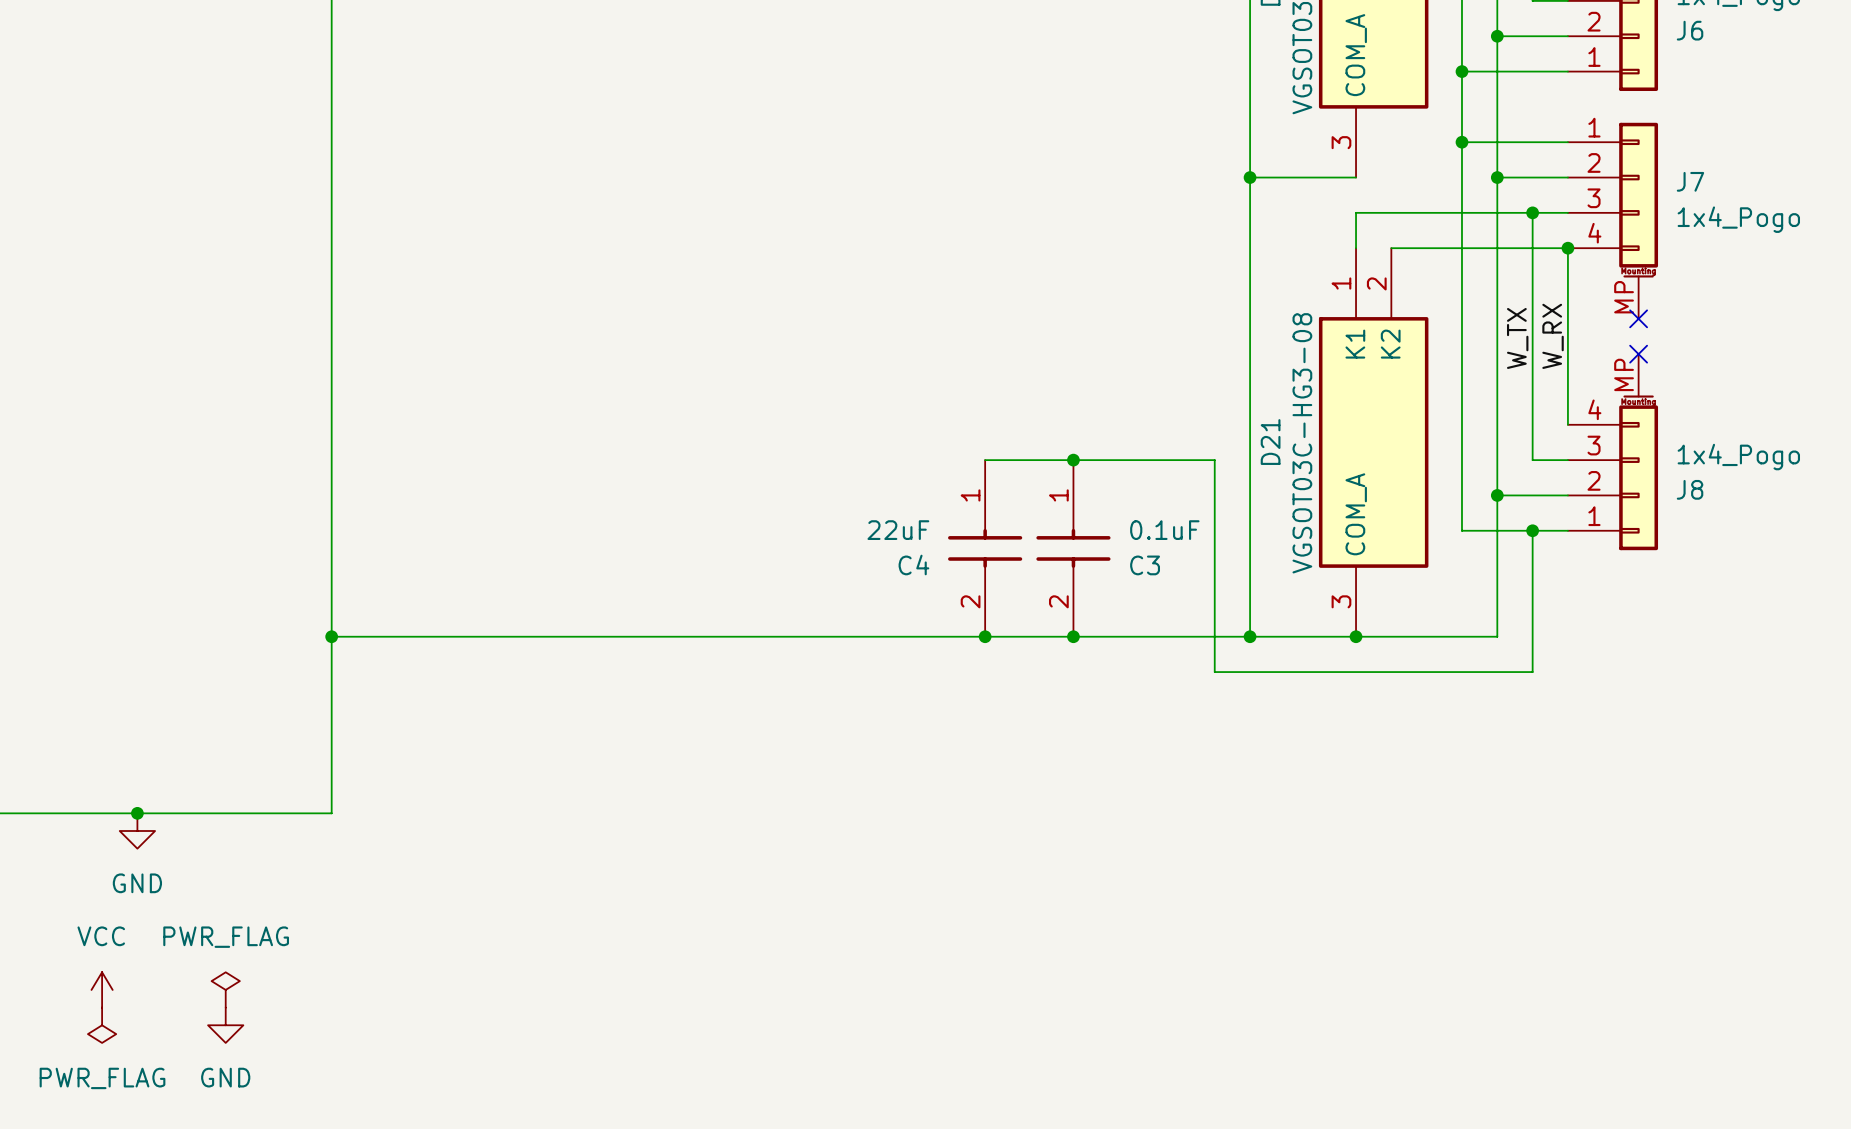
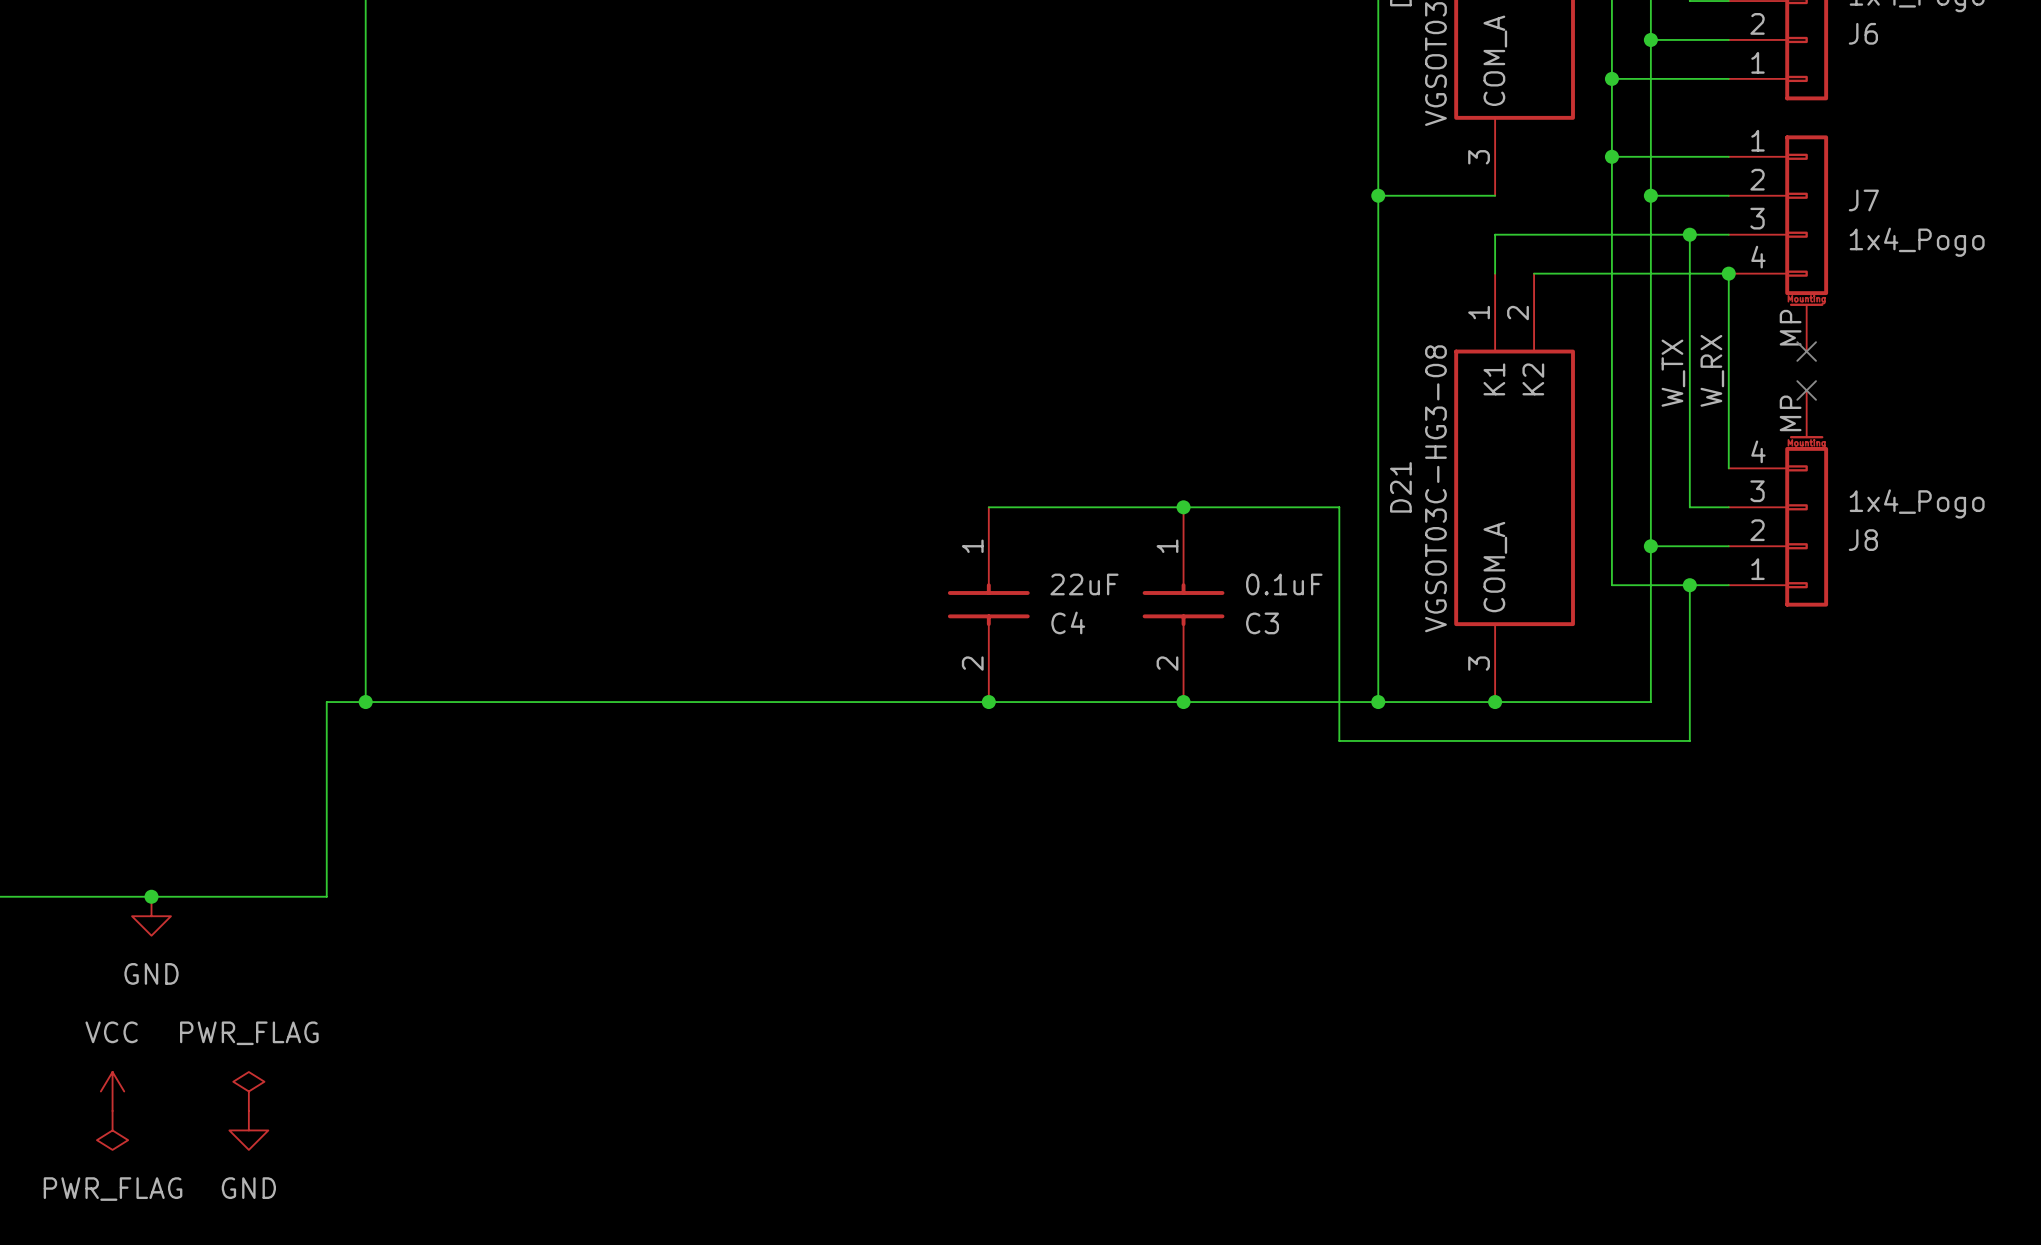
wire: none -> (988, 507) (1086, 507)
C4 value position: 22uF (898, 530) -> 22uF (1084, 584)
C4 position: (985, 548) -> (988, 604)
C4 name position: C4 (913, 565) -> C4 (1068, 622)
wire: (331, 636) (331, 813) (296, 813) -> (365, 702) (326, 702) (326, 896)
junction: none -> (988, 702)
junction: (985, 636) -> none

